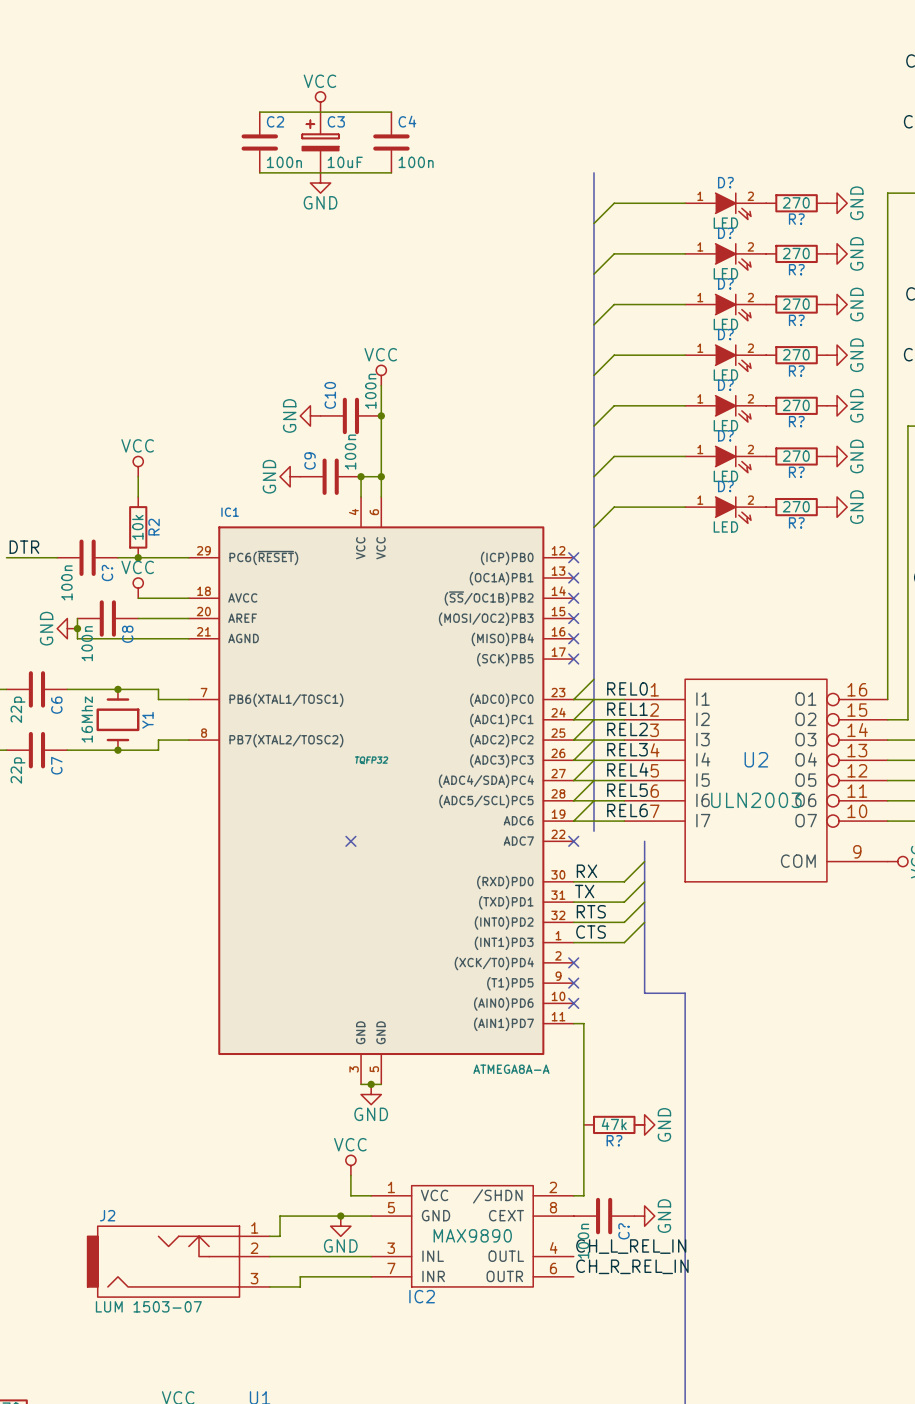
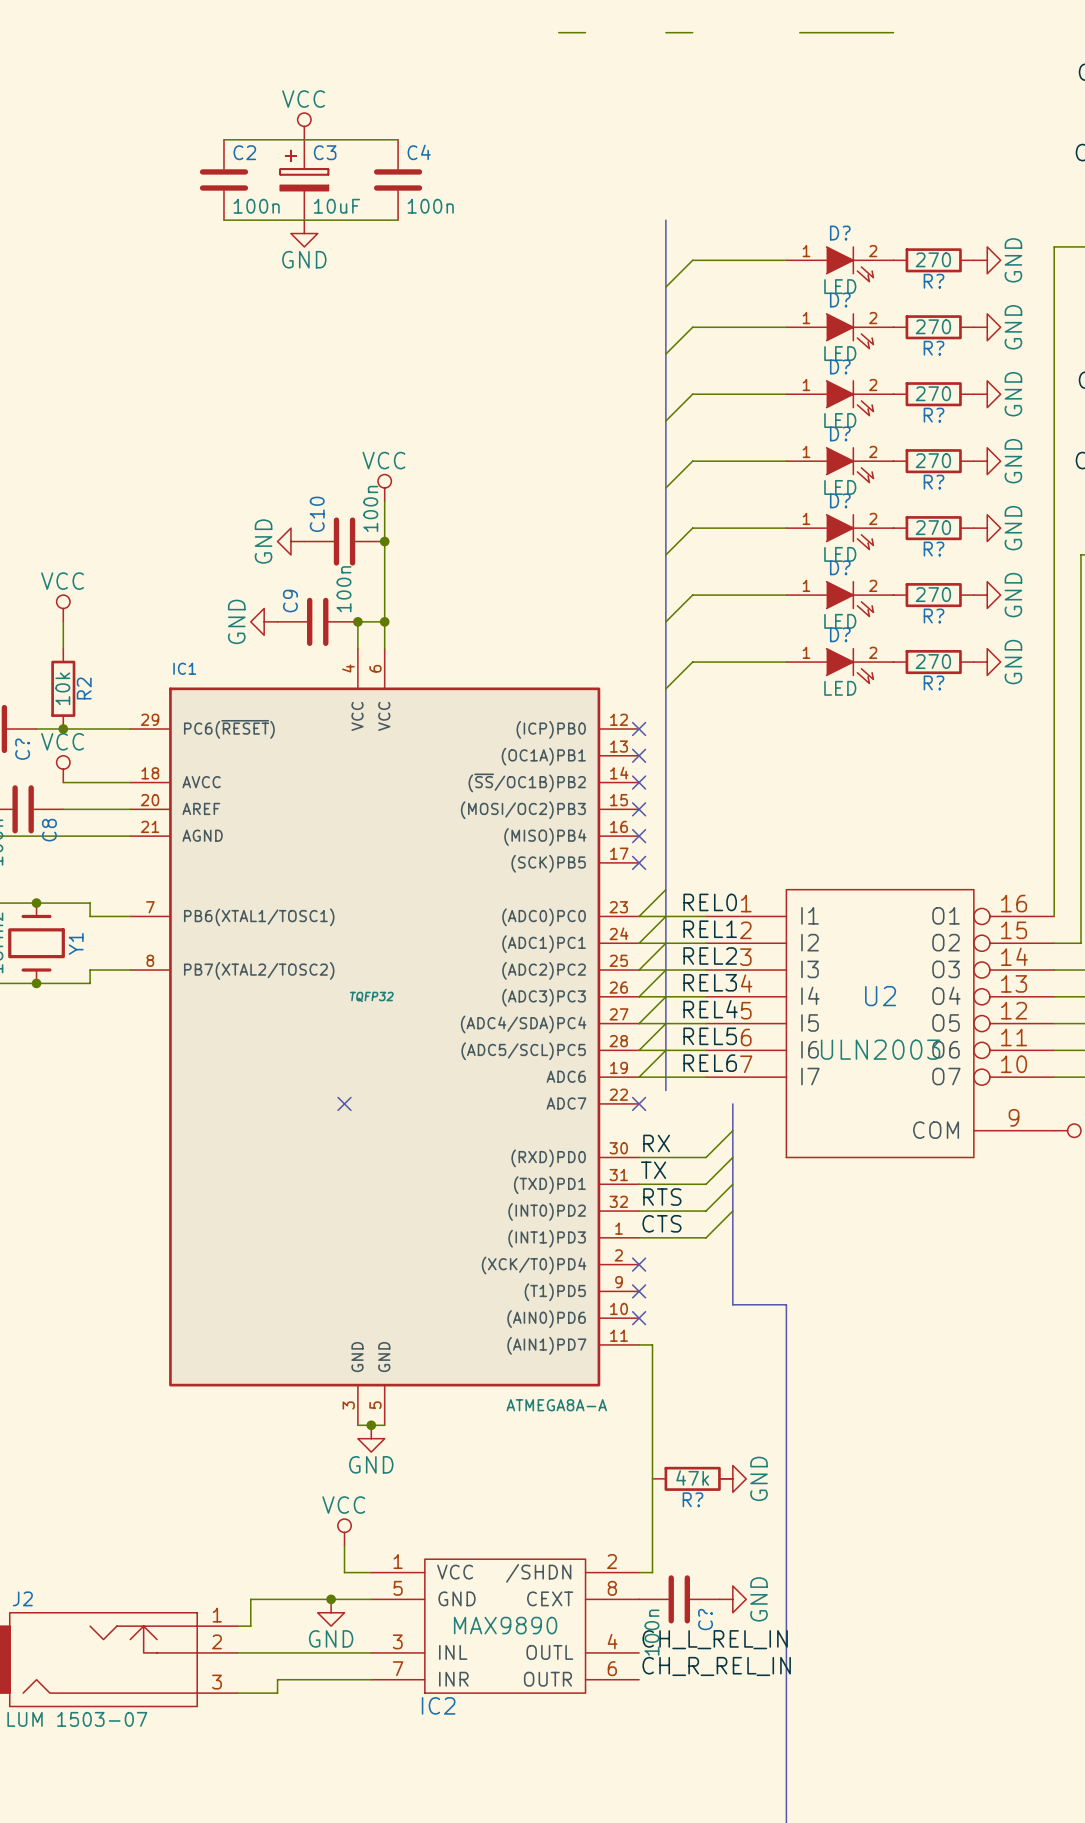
wire: none -> (558, 32) (585, 32)
wire: none -> (665, 32) (692, 32)
wire: none -> (799, 32) (893, 32)

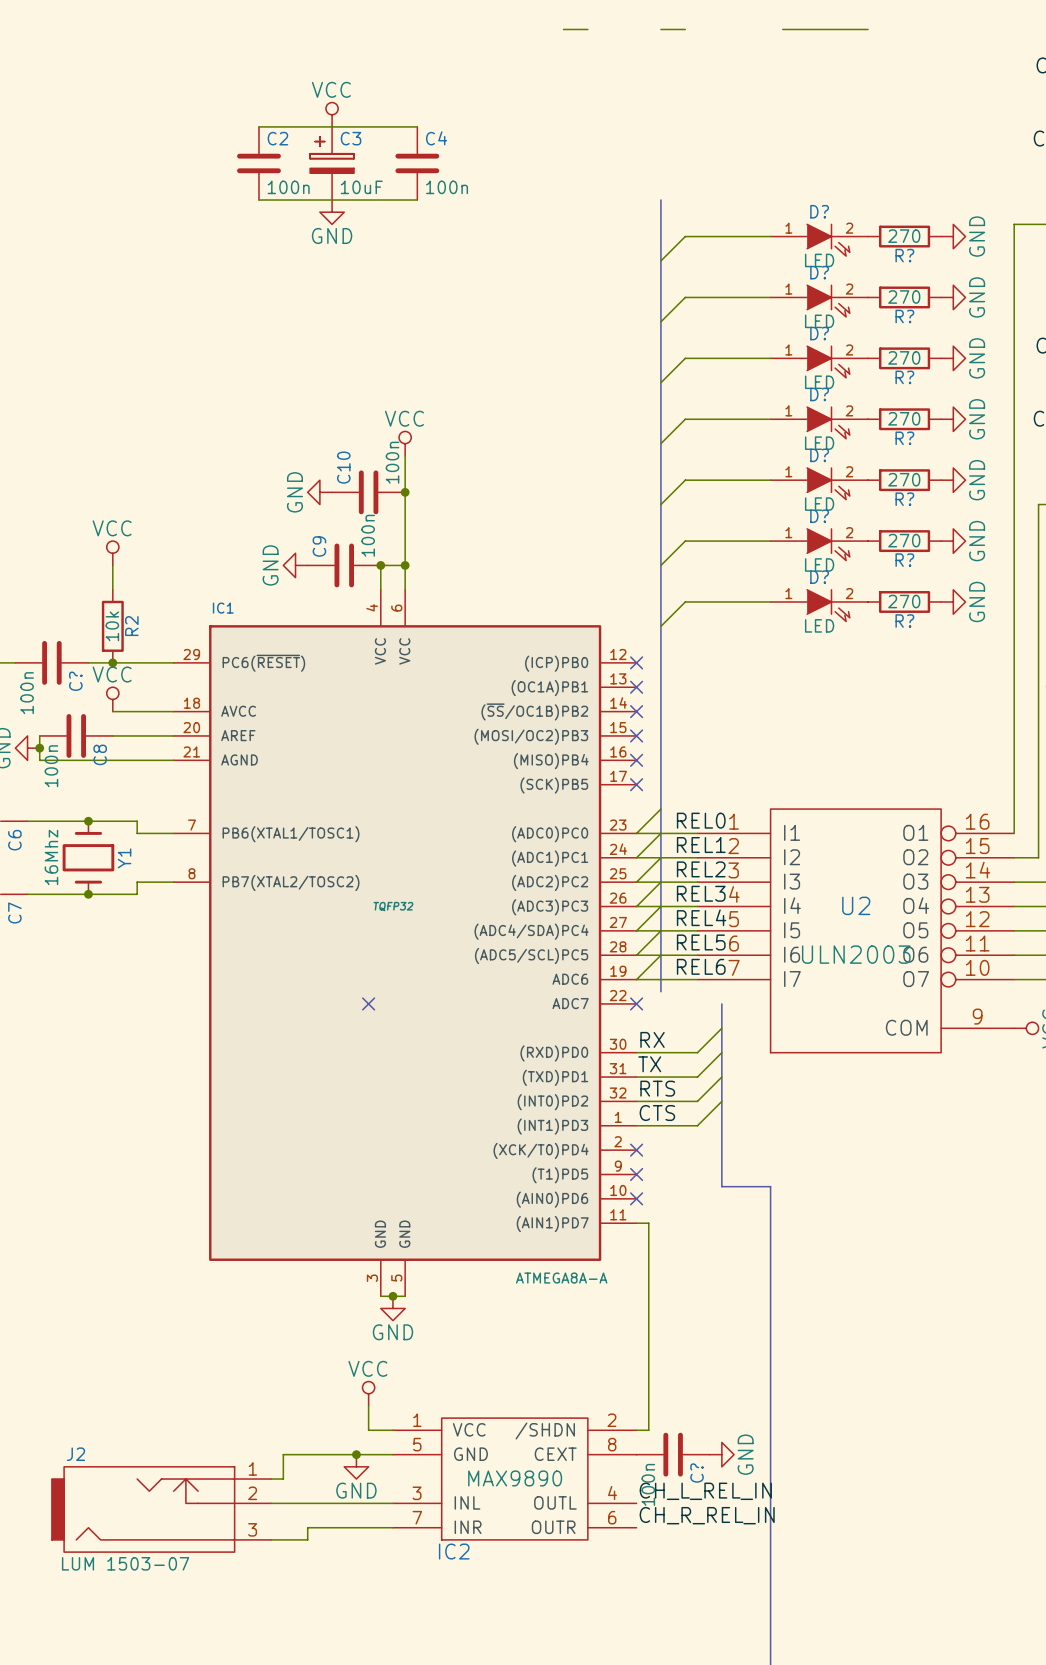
R?: 47k (692, 1478) -> none
power symbol: GND (732, 1478) -> none

